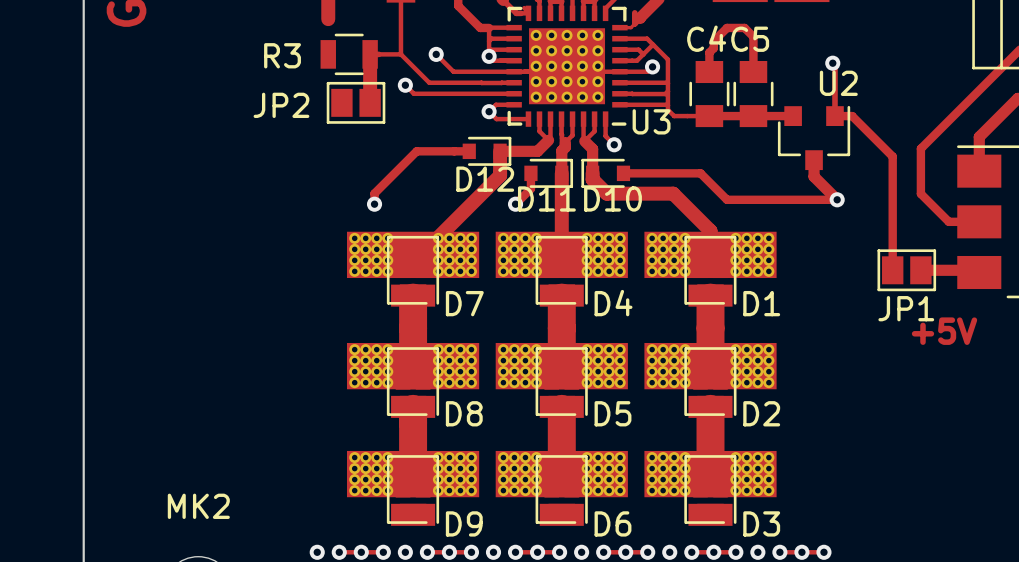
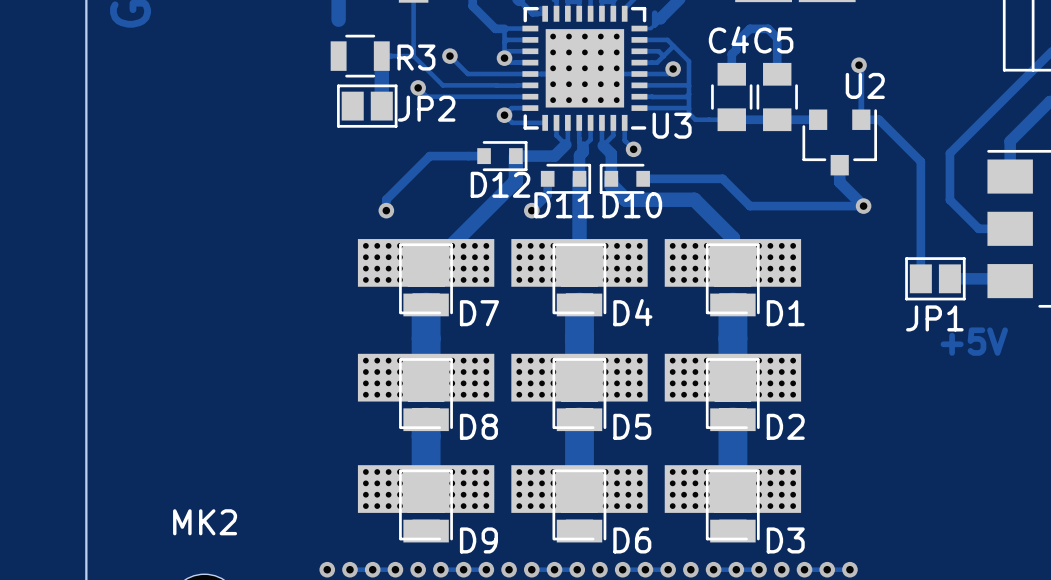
R3 name position: R3 (282, 55) -> R3 (416, 57)
JP2 name position: JP2 (281, 105) -> JP2 (426, 108)

